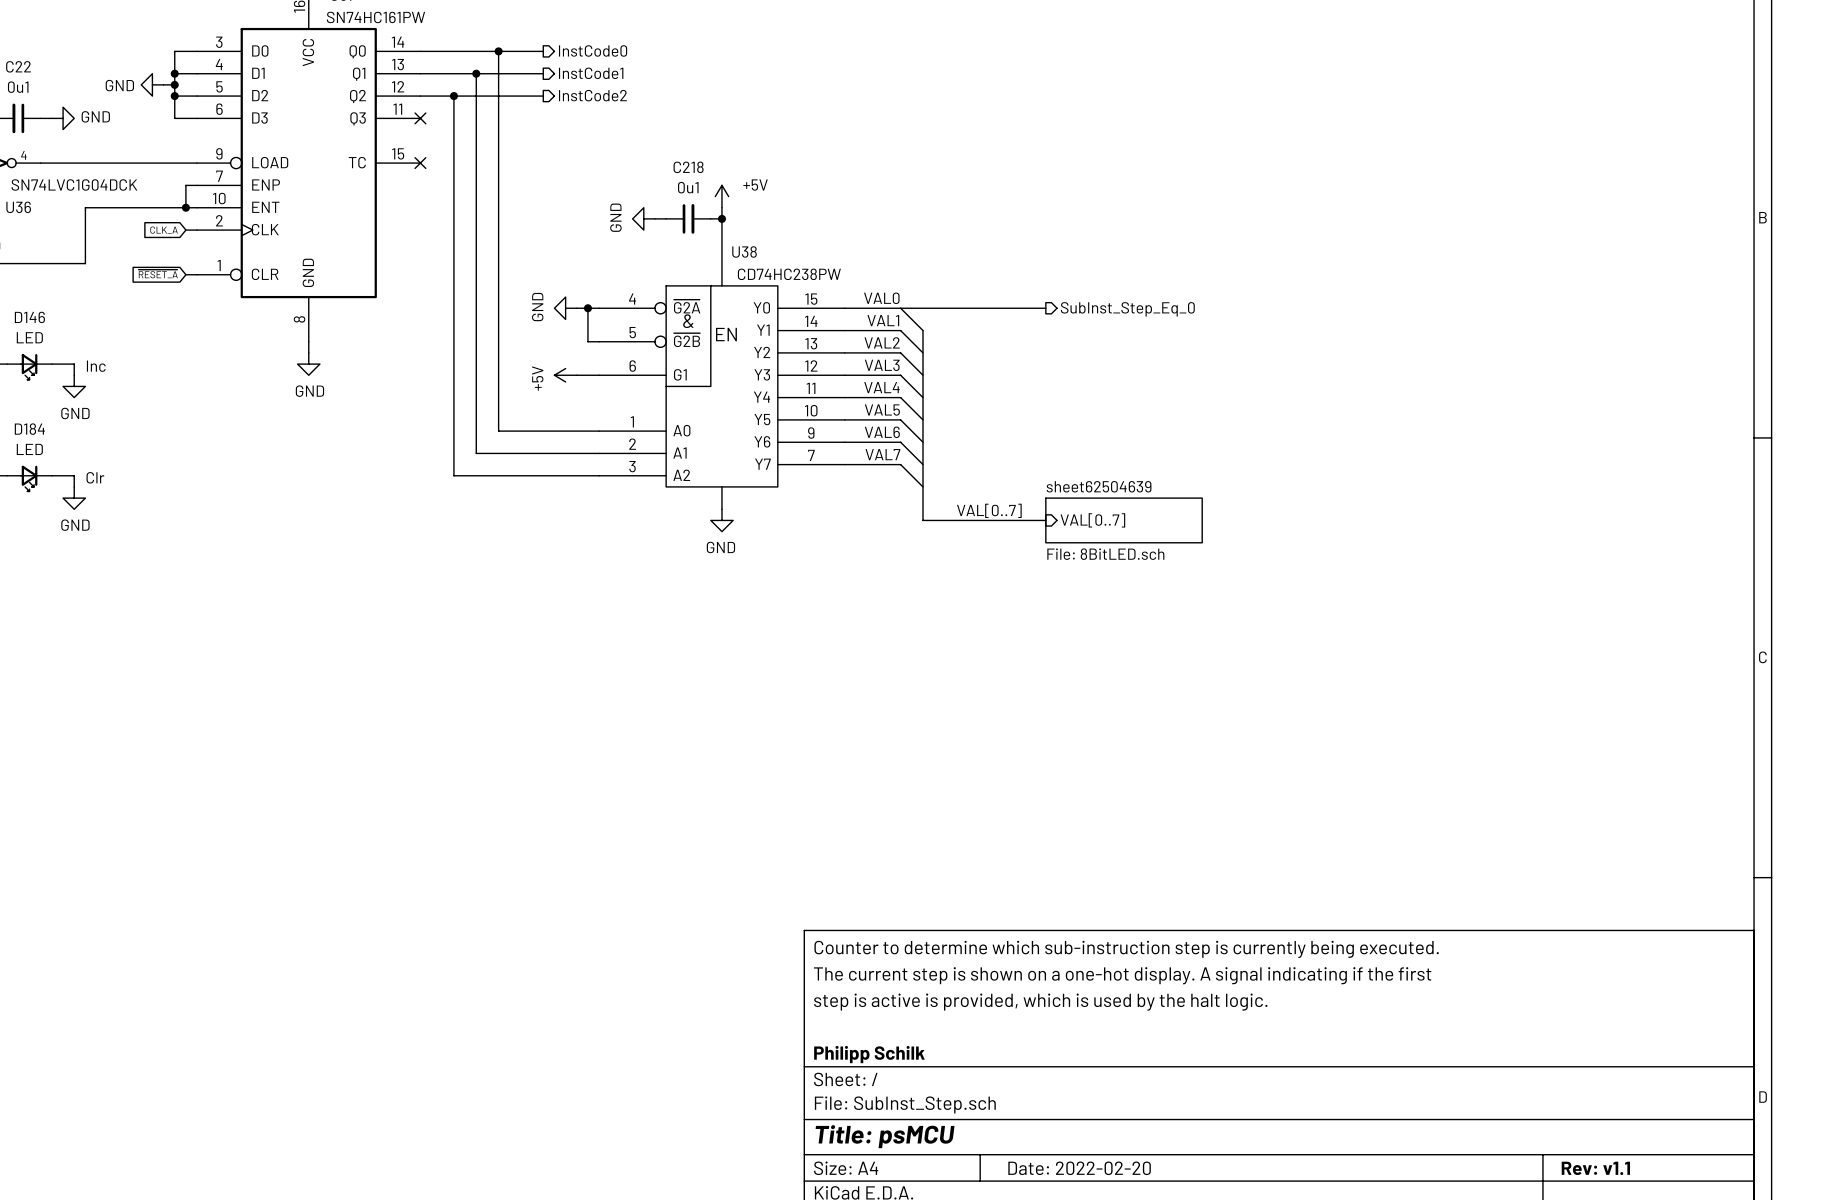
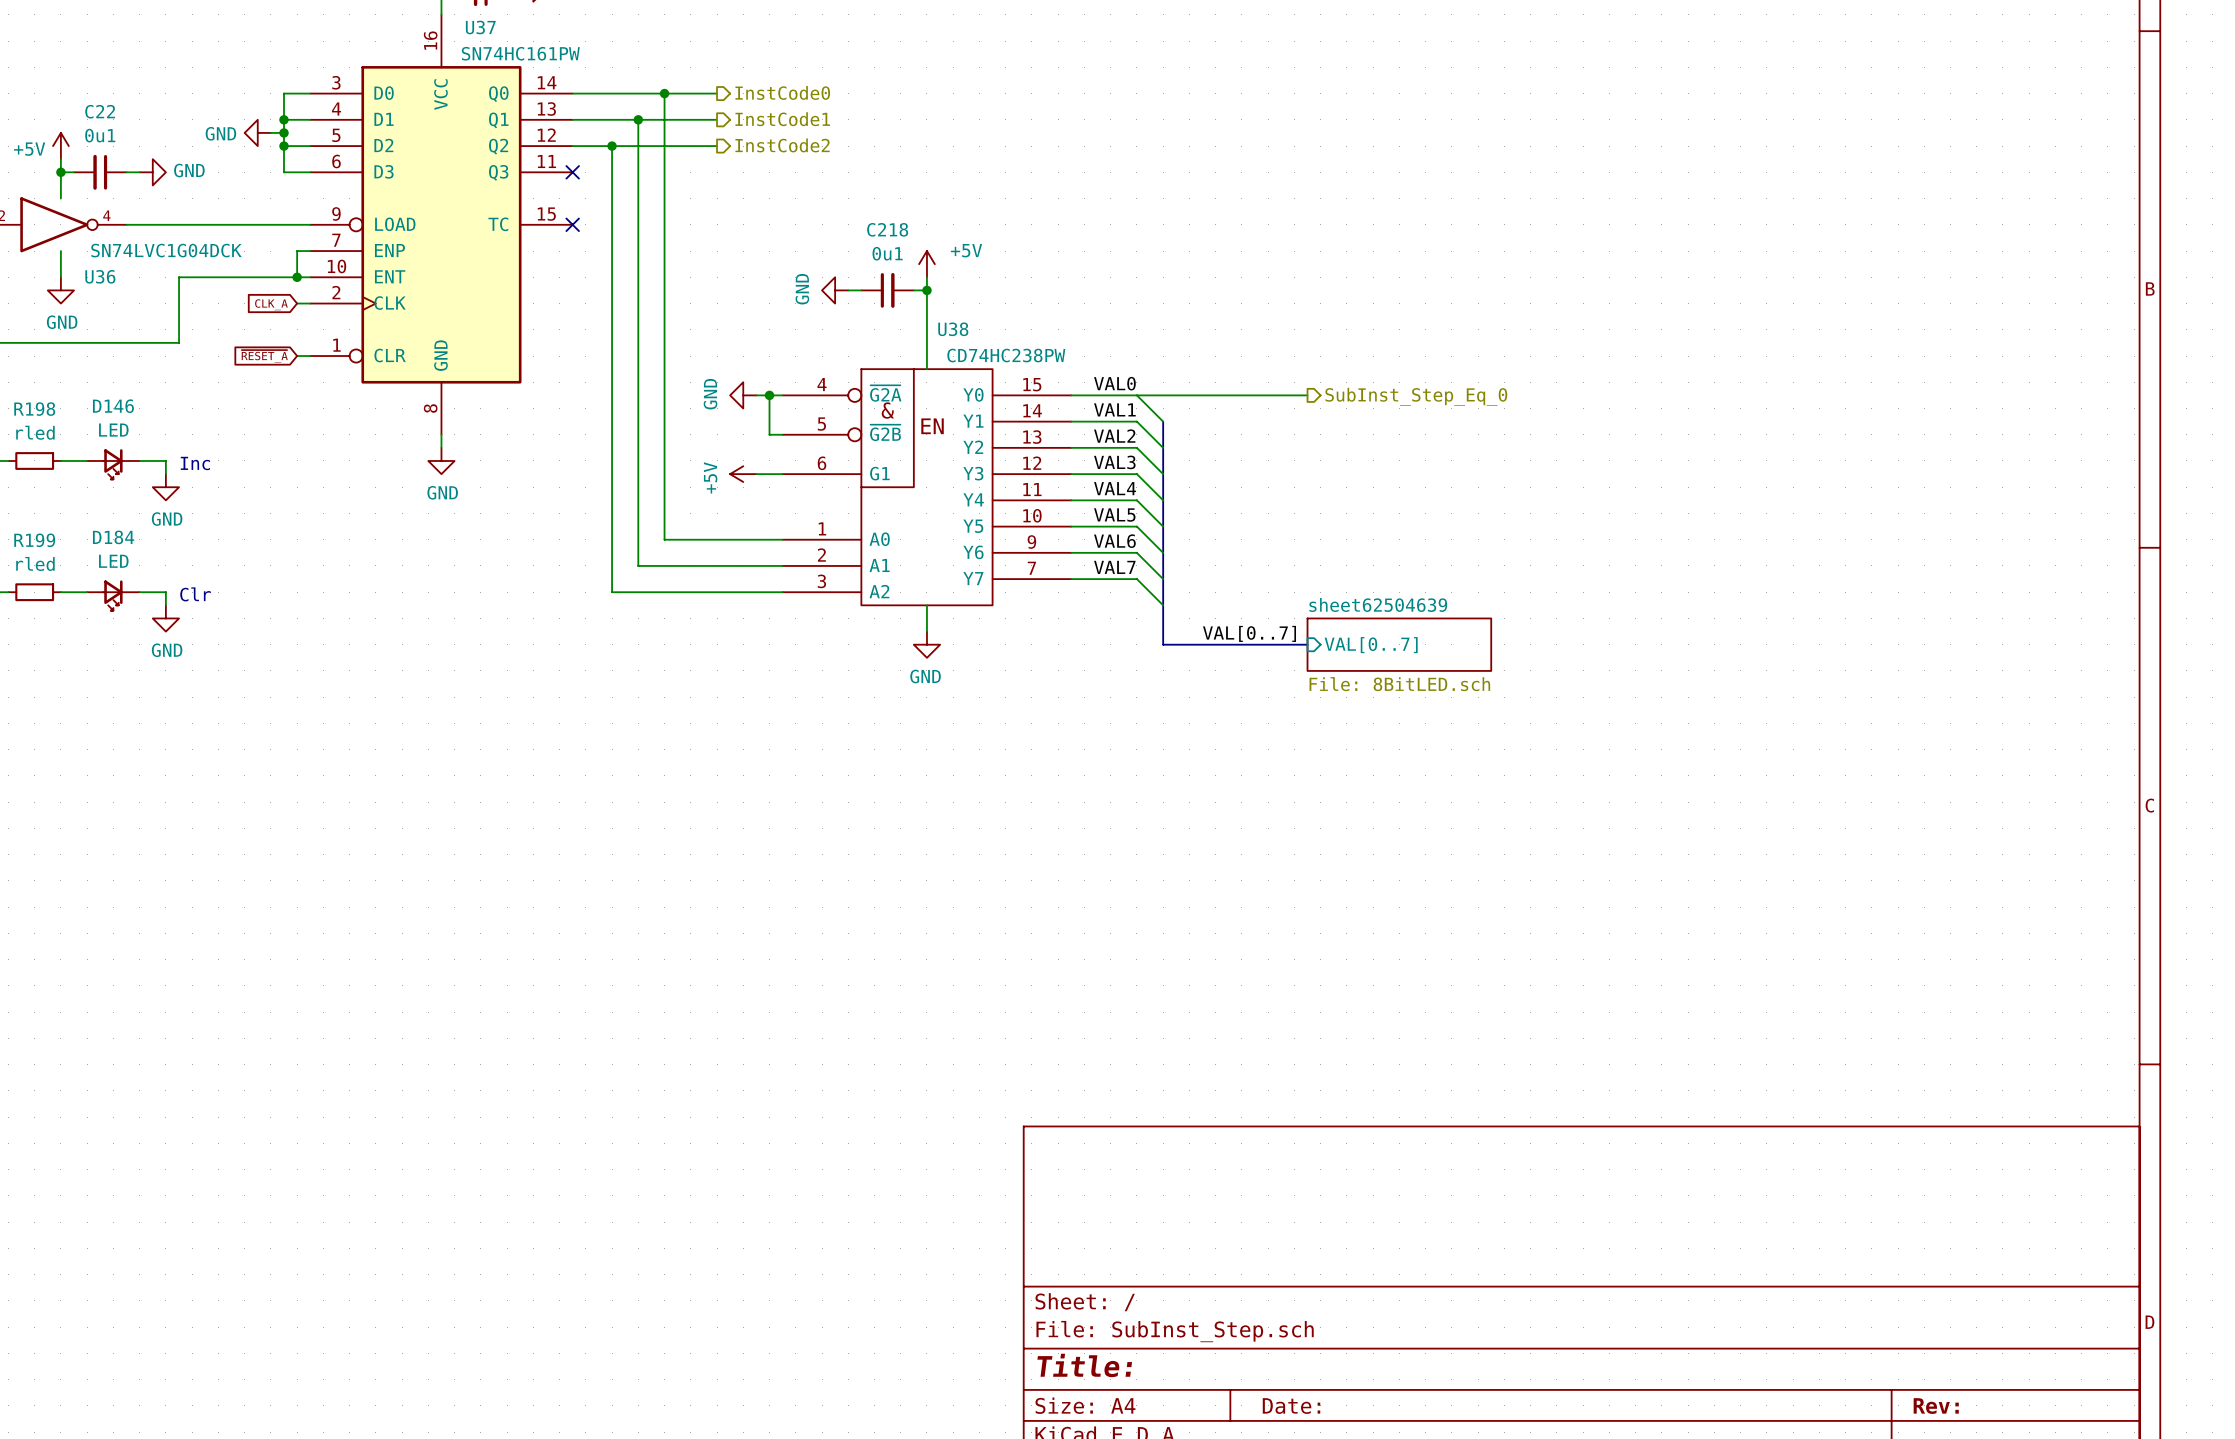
title block: Counter to determine which sub-instruction step is currently being executed. (1126, 949) -> none
title block: The current step is shown on a one-hot display. A signal indicating if the first (1122, 975) -> none
title block: step is active is provided, which is used by the halt logic. (1040, 1002) -> none
title block: Philipp Schilk (869, 1054) -> none
title block: Title: psMCU (885, 1136) -> Title: (1084, 1365)
title block: Date: 2022-02-20 (1079, 1168) -> Date: (1291, 1406)
title block: Rev: v1.1 (1595, 1168) -> Rev: (1936, 1406)

